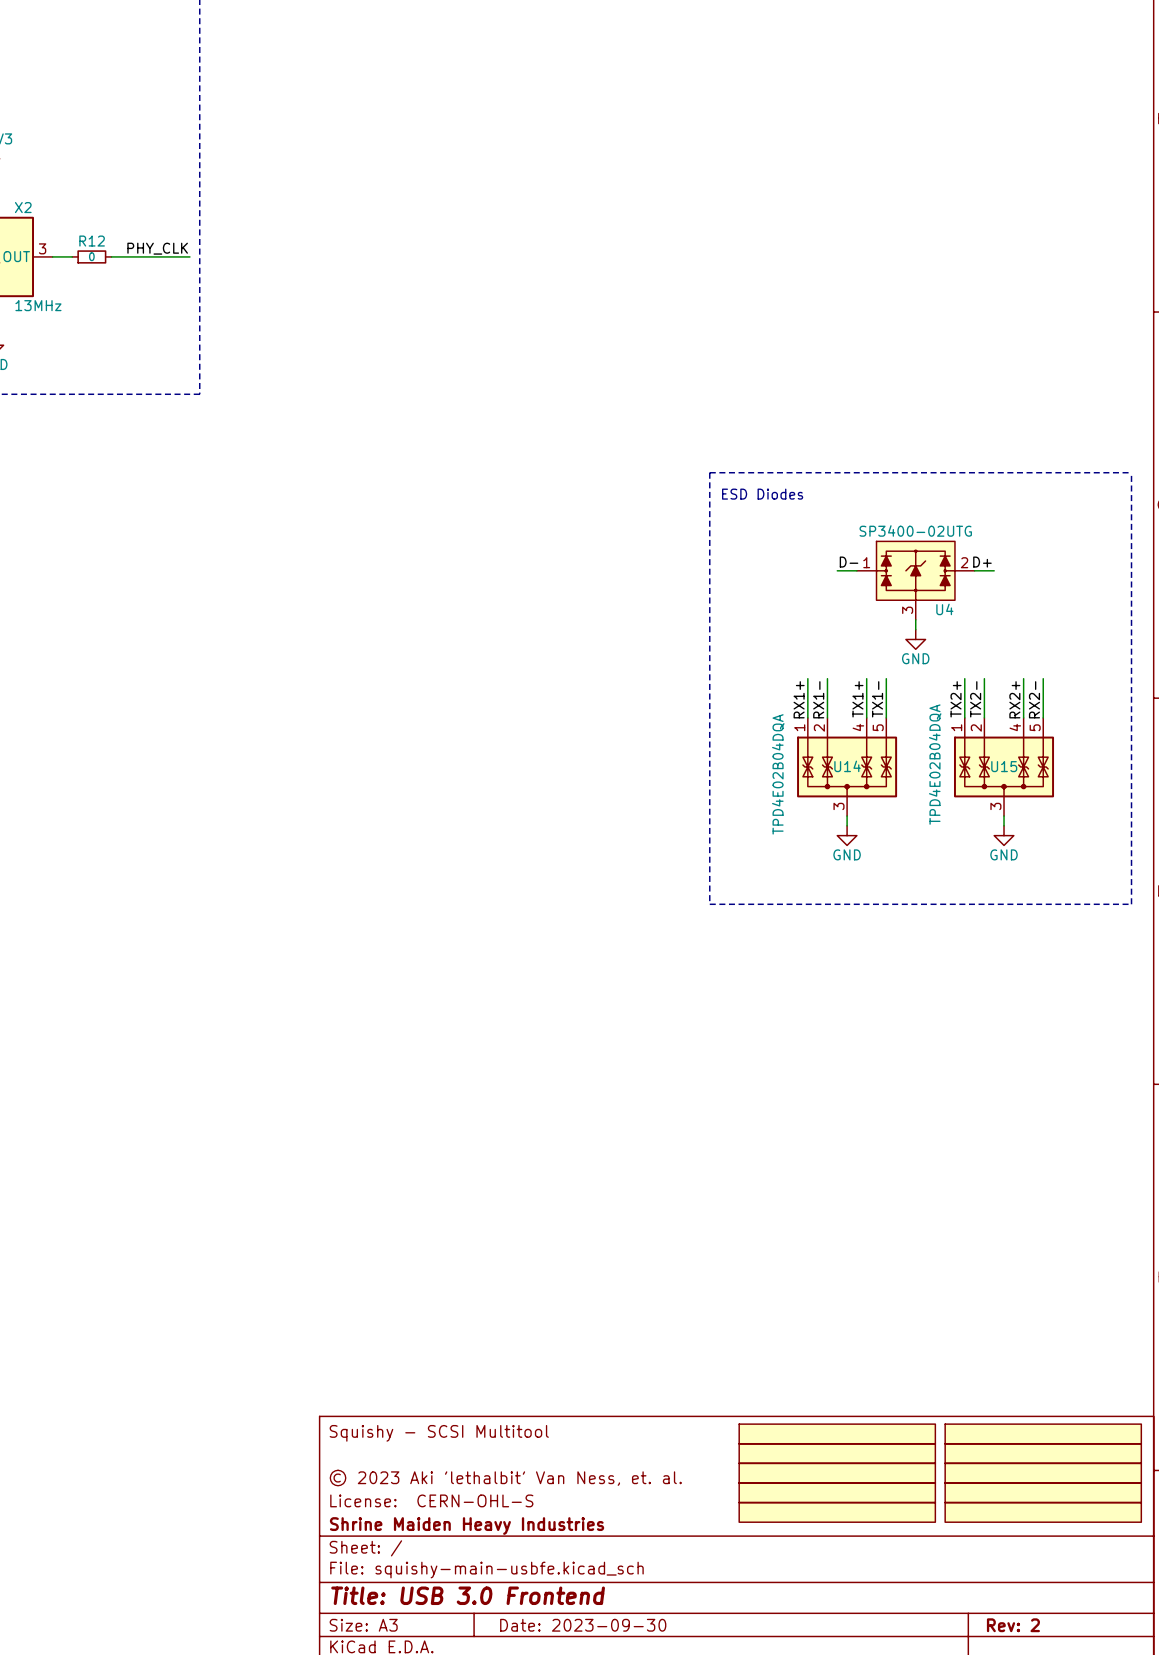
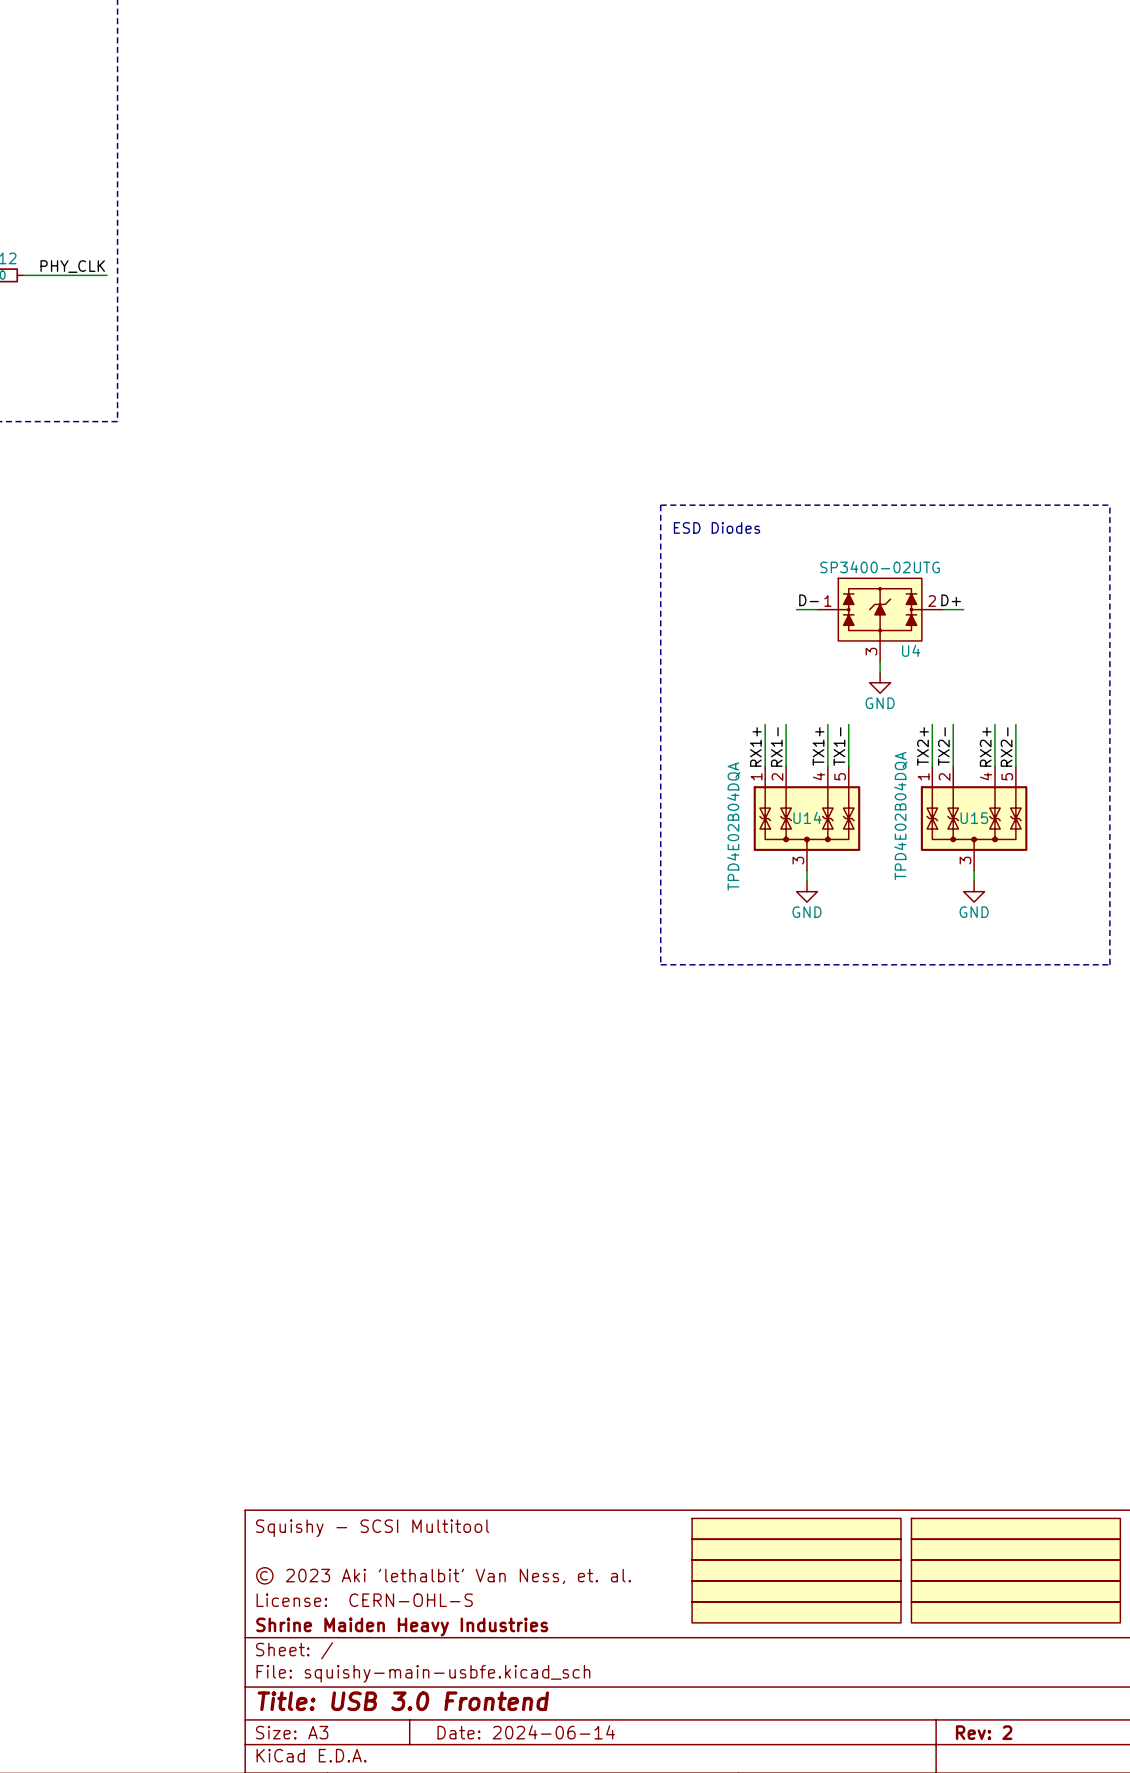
title block: Date: 2023-09-30 (583, 1625) -> Date: 2024-06-14 (526, 1732)

